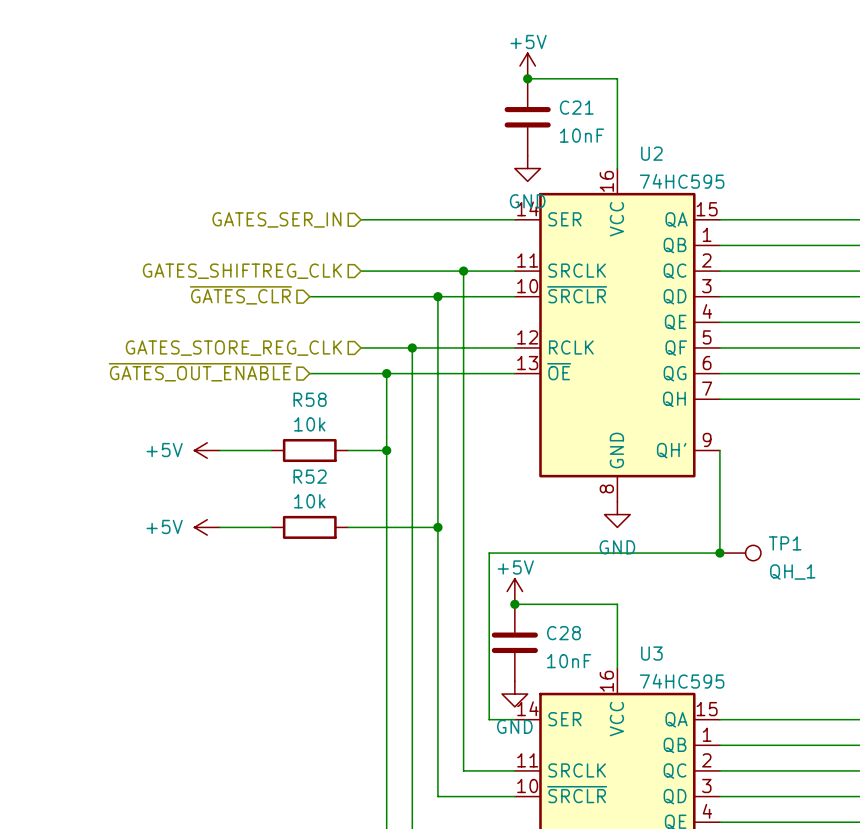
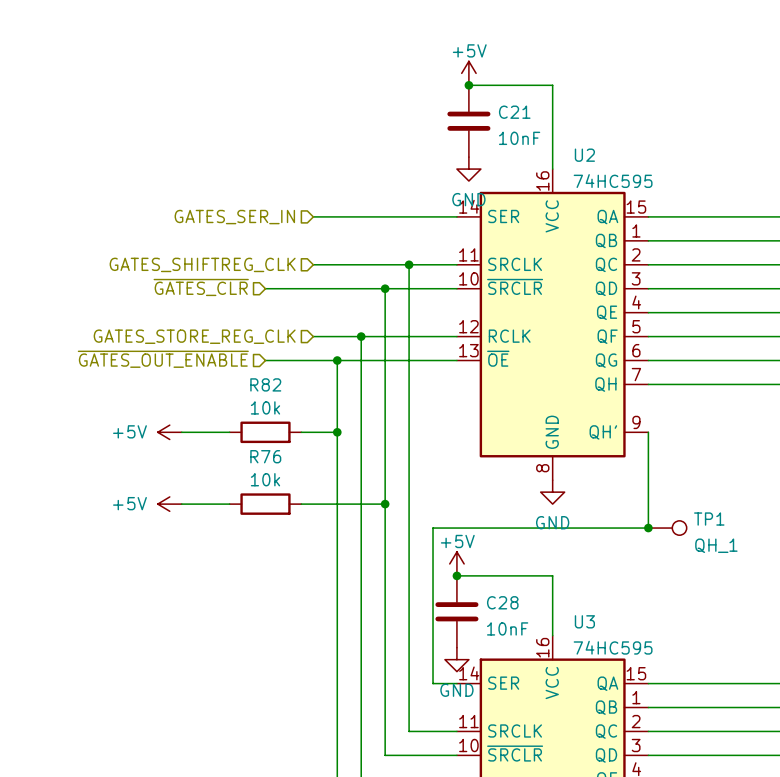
R58 name: R58 (310, 399) -> R82 (265, 384)
R52 name: R52 (310, 476) -> R76 (265, 456)

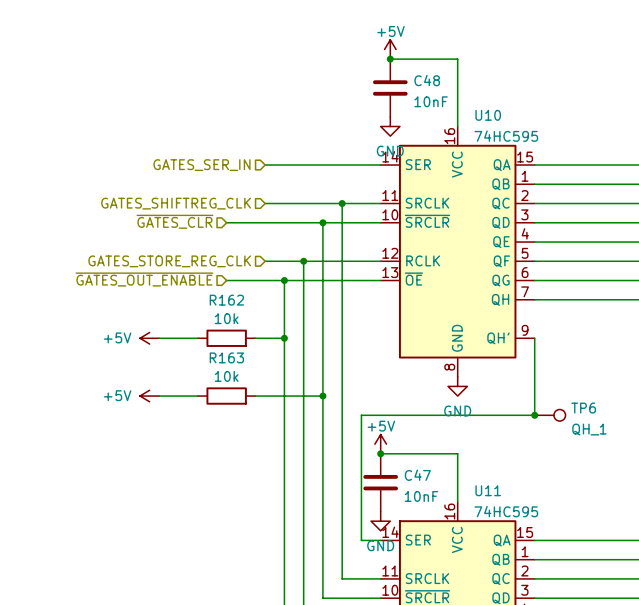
C21 name: C21 (514, 112) -> C48 (427, 80)
U2 name: U2 (584, 155) -> U10 (488, 115)
R82 name: R82 (265, 384) -> R162 (226, 300)
R76 name: R76 (265, 456) -> R163 (226, 357)
TP1 name: TP1 (709, 519) -> TP6 (583, 408)
C28 name: C28 (502, 602) -> C47 (417, 475)
U3 name: U3 (584, 621) -> U11 (488, 490)

